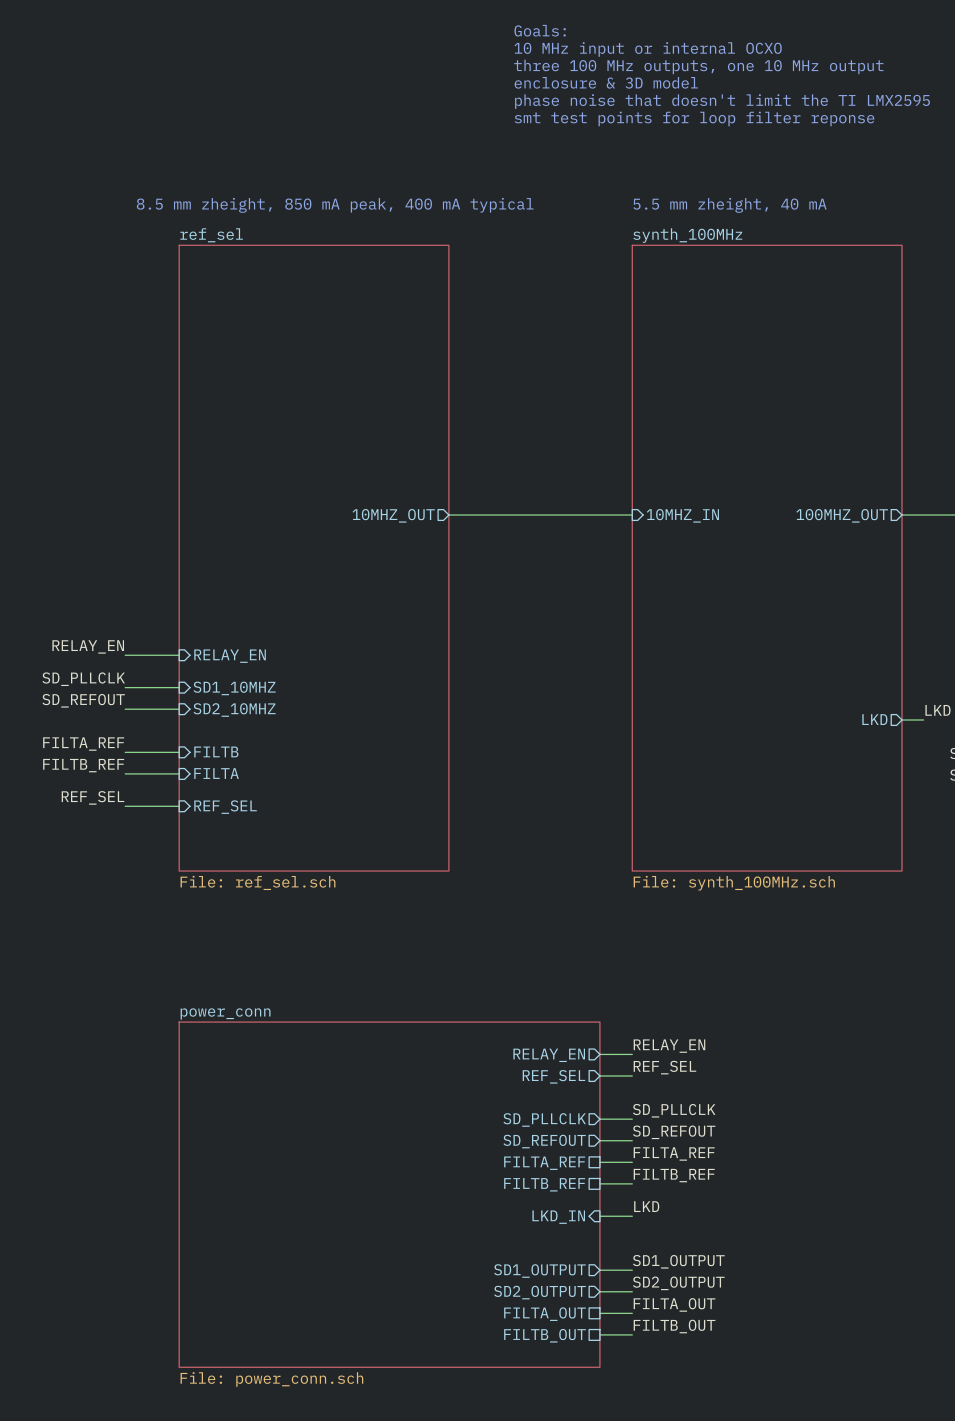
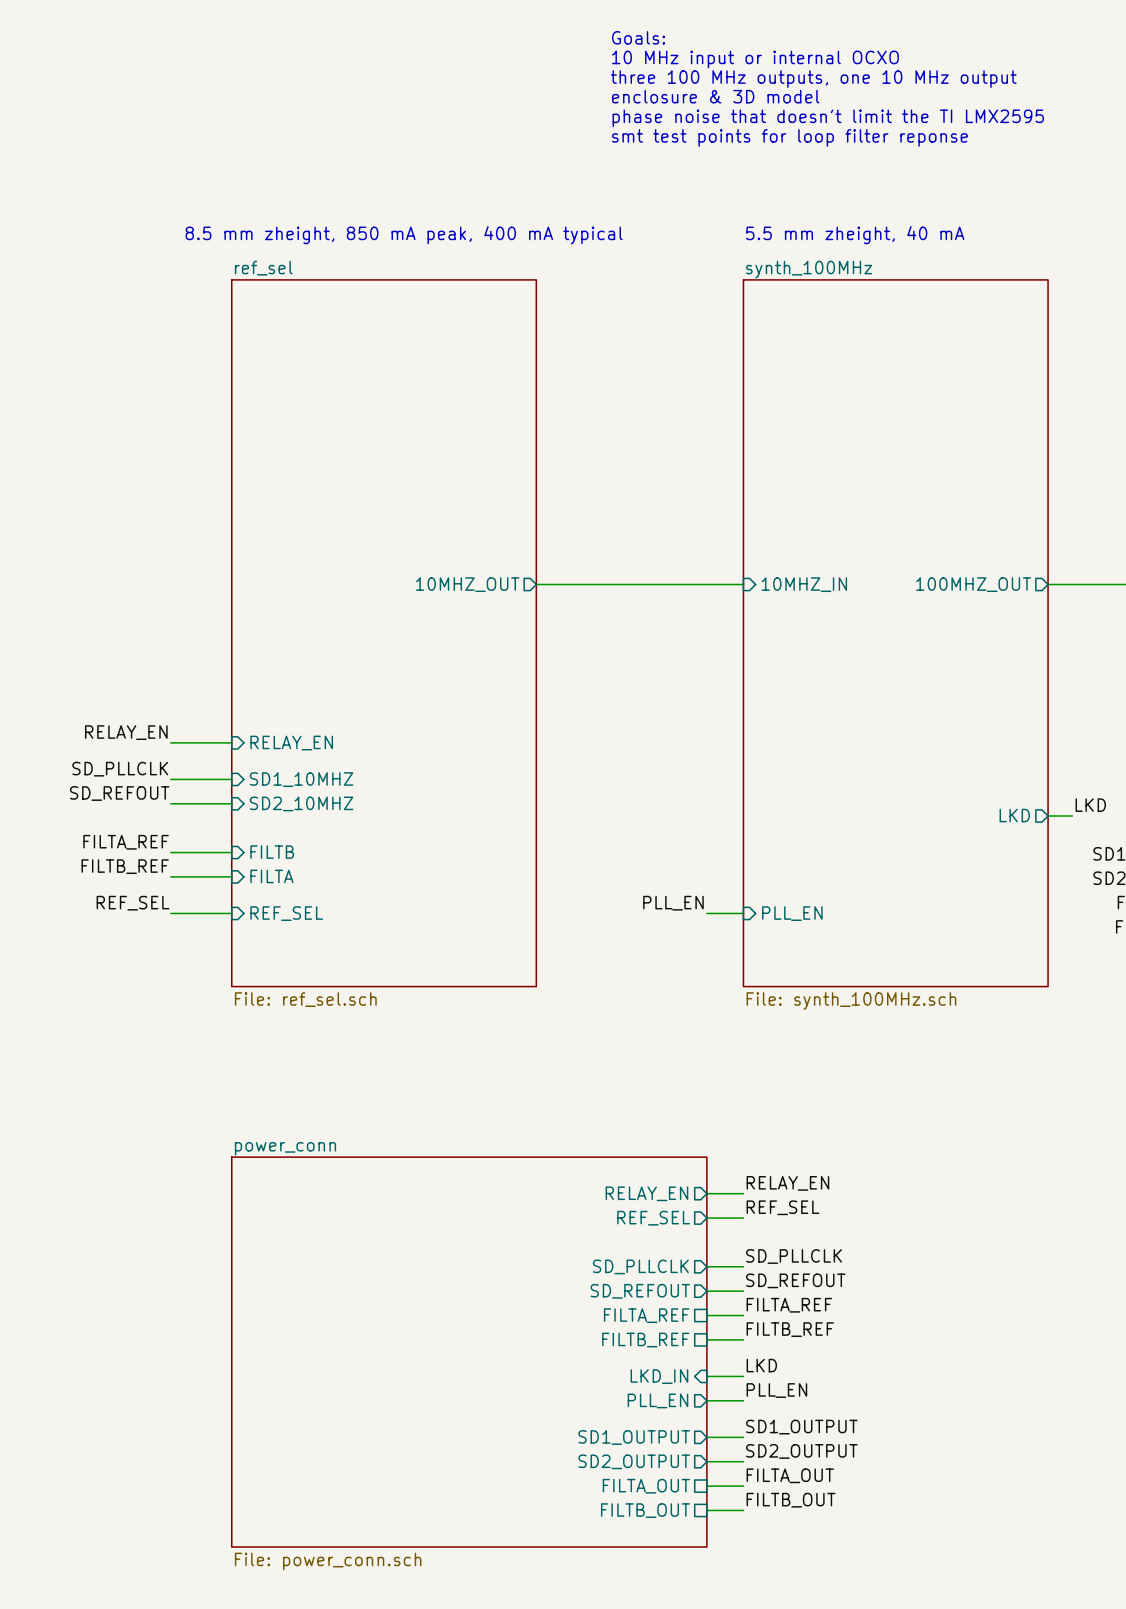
label: none -> PLL_EN (673, 903)
wire: none -> (706, 913) (743, 913)
sheet pin: none -> PLL_EN (792, 913)
label: none -> PLL_EN (776, 1390)
wire: none -> (706, 1400) (743, 1400)
sheet pin: none -> PLL_EN (657, 1400)

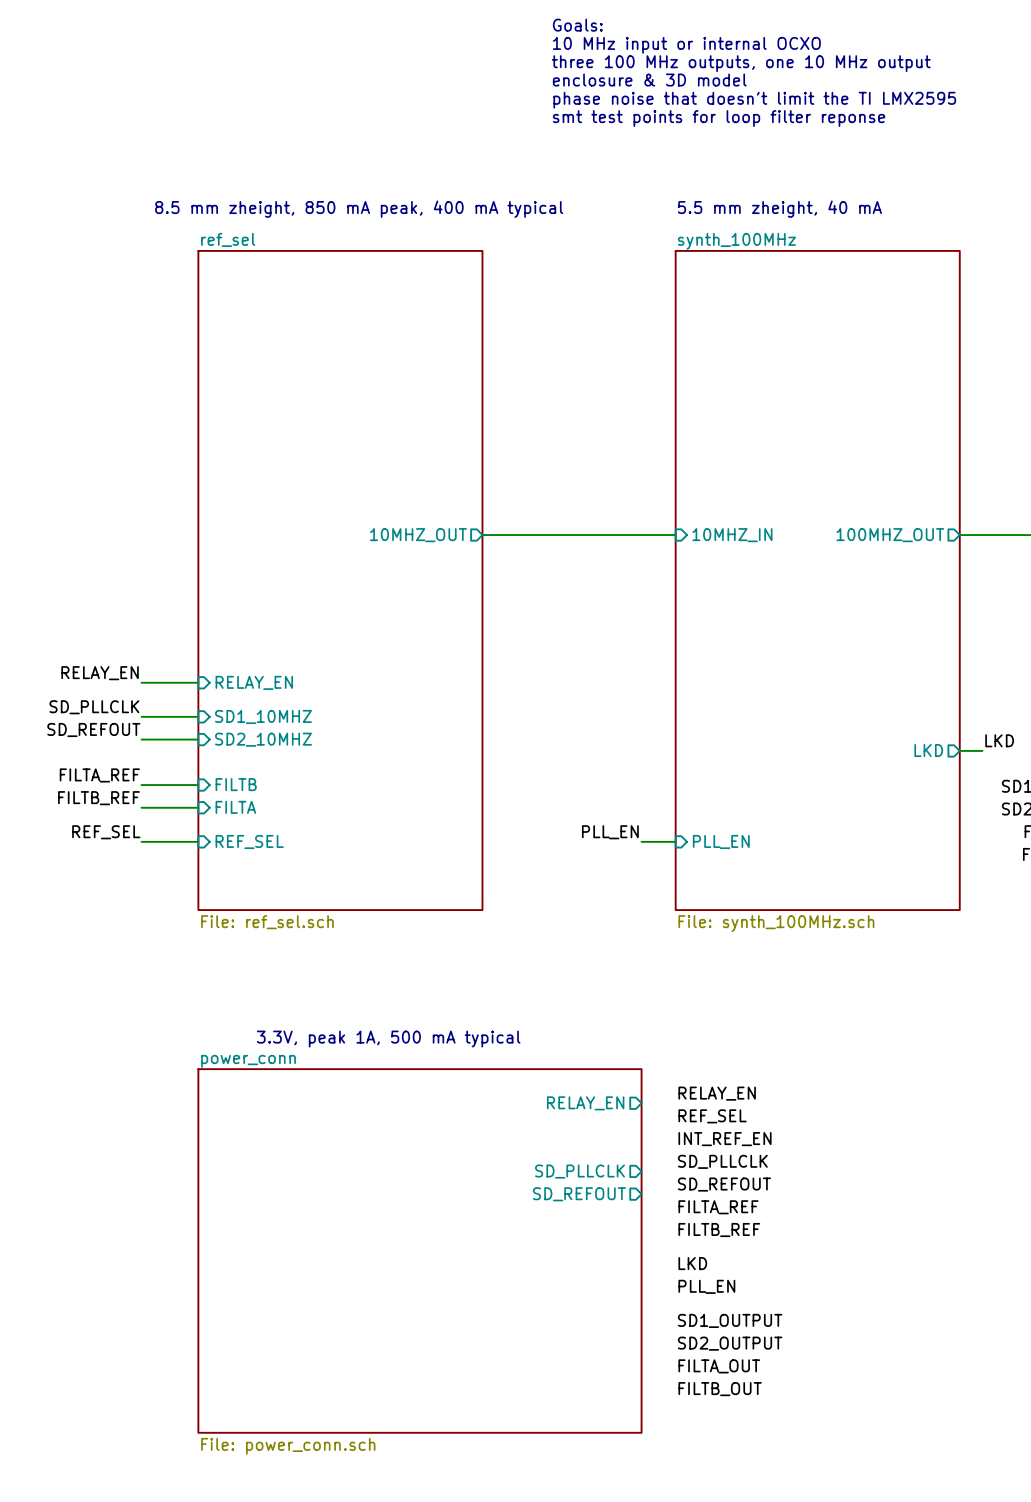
text: none -> 3.3V, peak 1A, 500 mA typical (388, 1039)
wire: (706, 1193) (743, 1193) -> none
sheet pin: REF_SEL (653, 1218) -> none
wire: (706, 1218) (743, 1218) -> none
label: none -> INT_REF_EN (725, 1139)
wire: (706, 1266) (743, 1266) -> none
wire: (706, 1291) (743, 1291) -> none
sheet pin: FILTA_REF (646, 1315) -> none
wire: (706, 1315) (743, 1315) -> none
wire: (706, 1339) (743, 1339) -> none
sheet pin: FILTB_REF (645, 1340) -> none
sheet pin: LKD_IN (659, 1376) -> none
wire: (706, 1376) (743, 1376) -> none
sheet pin: PLL_EN (657, 1400) -> none
wire: (706, 1400) (743, 1400) -> none
sheet pin: SD1_OUTPUT (634, 1437) -> none
wire: (706, 1437) (743, 1437) -> none
sheet pin: SD2_OUTPUT (634, 1461) -> none
wire: (706, 1461) (743, 1461) -> none
sheet pin: FILTA_OUT (646, 1486) -> none
wire: (706, 1486) (743, 1486) -> none
sheet pin: FILTB_OUT (645, 1510) -> none
wire: (706, 1510) (743, 1510) -> none

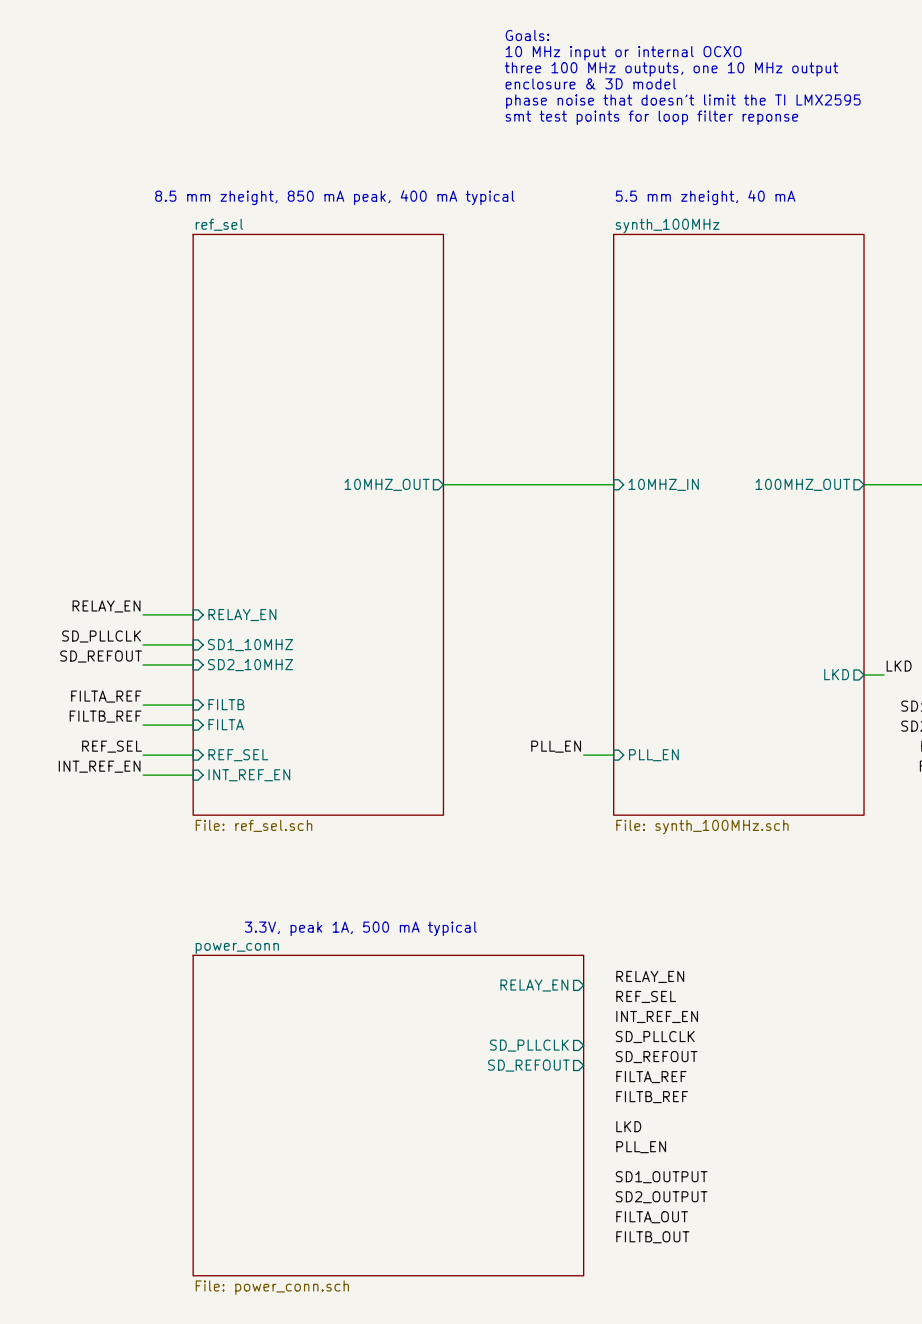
label: none -> INT_REF_EN (99, 766)
wire: none -> (143, 775) (193, 775)
sheet pin: none -> INT_REF_EN (249, 775)

